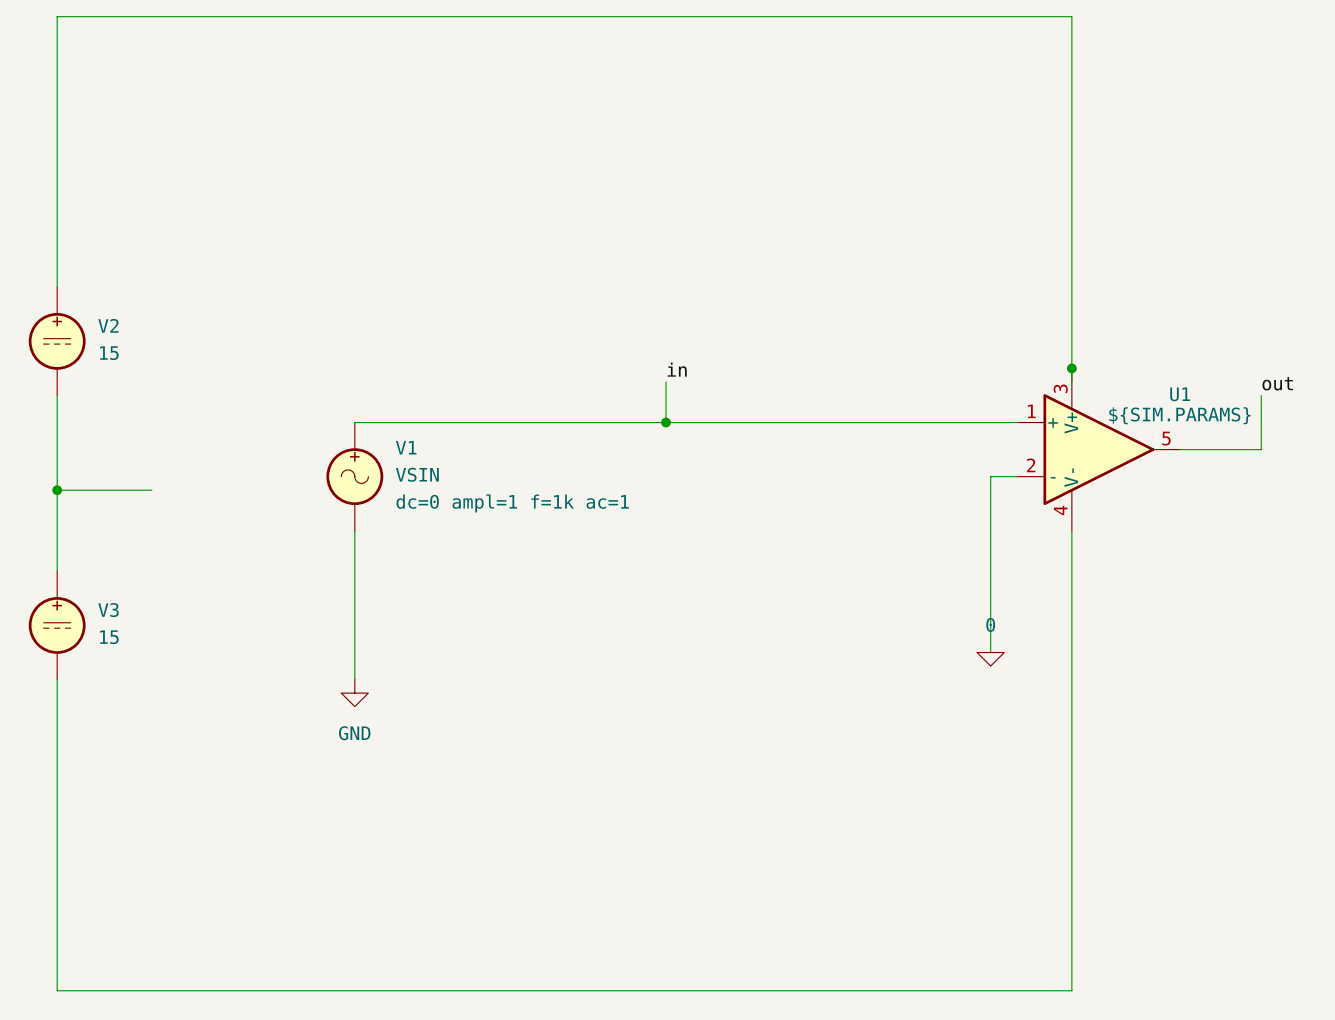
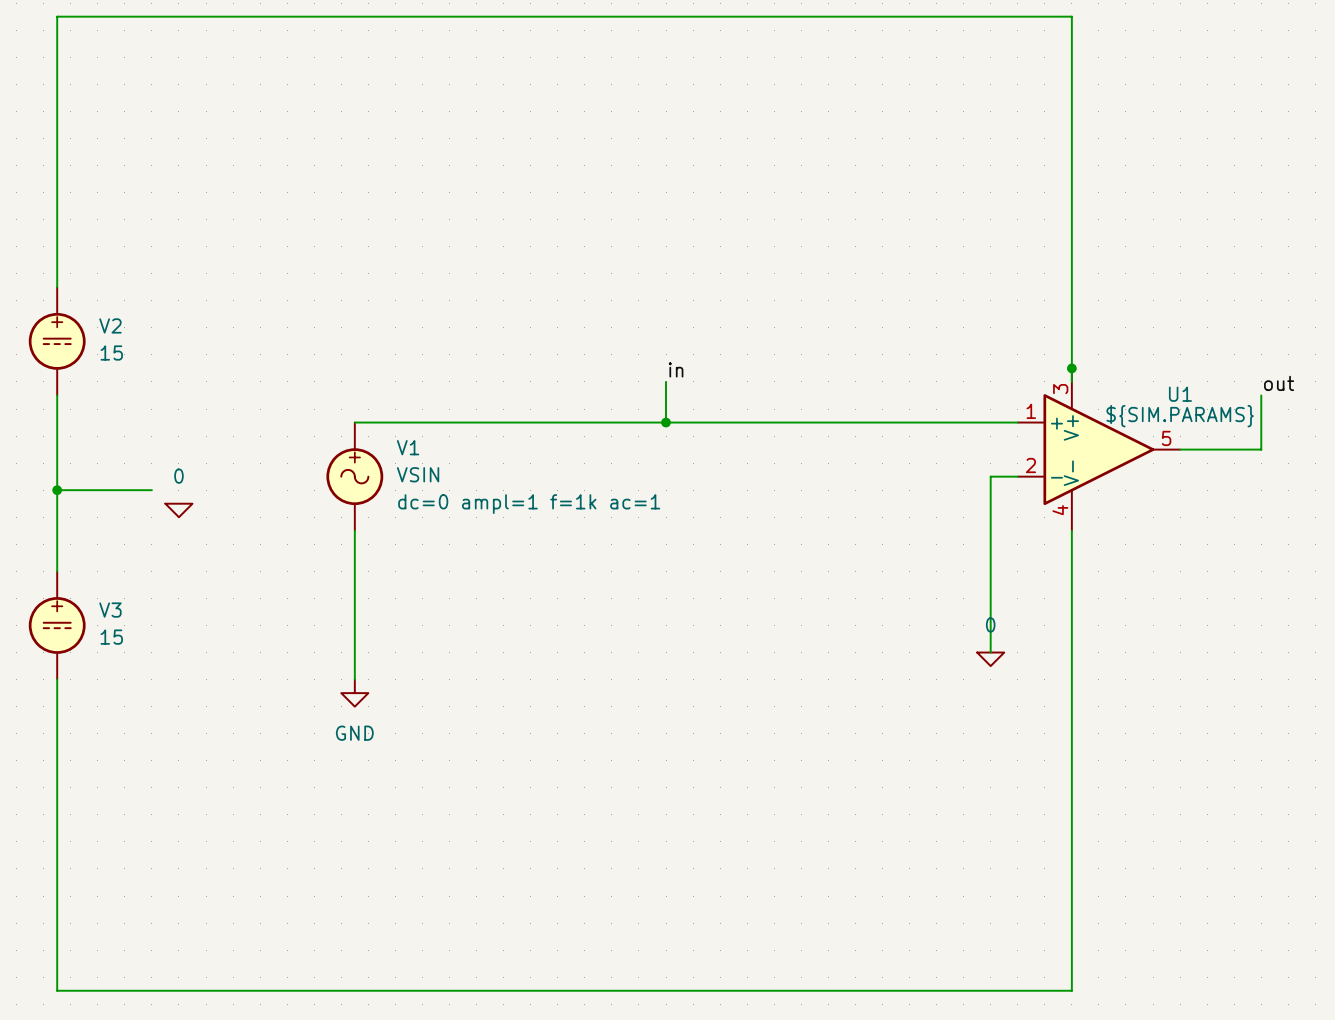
power symbol: none -> 0 (178, 510)

